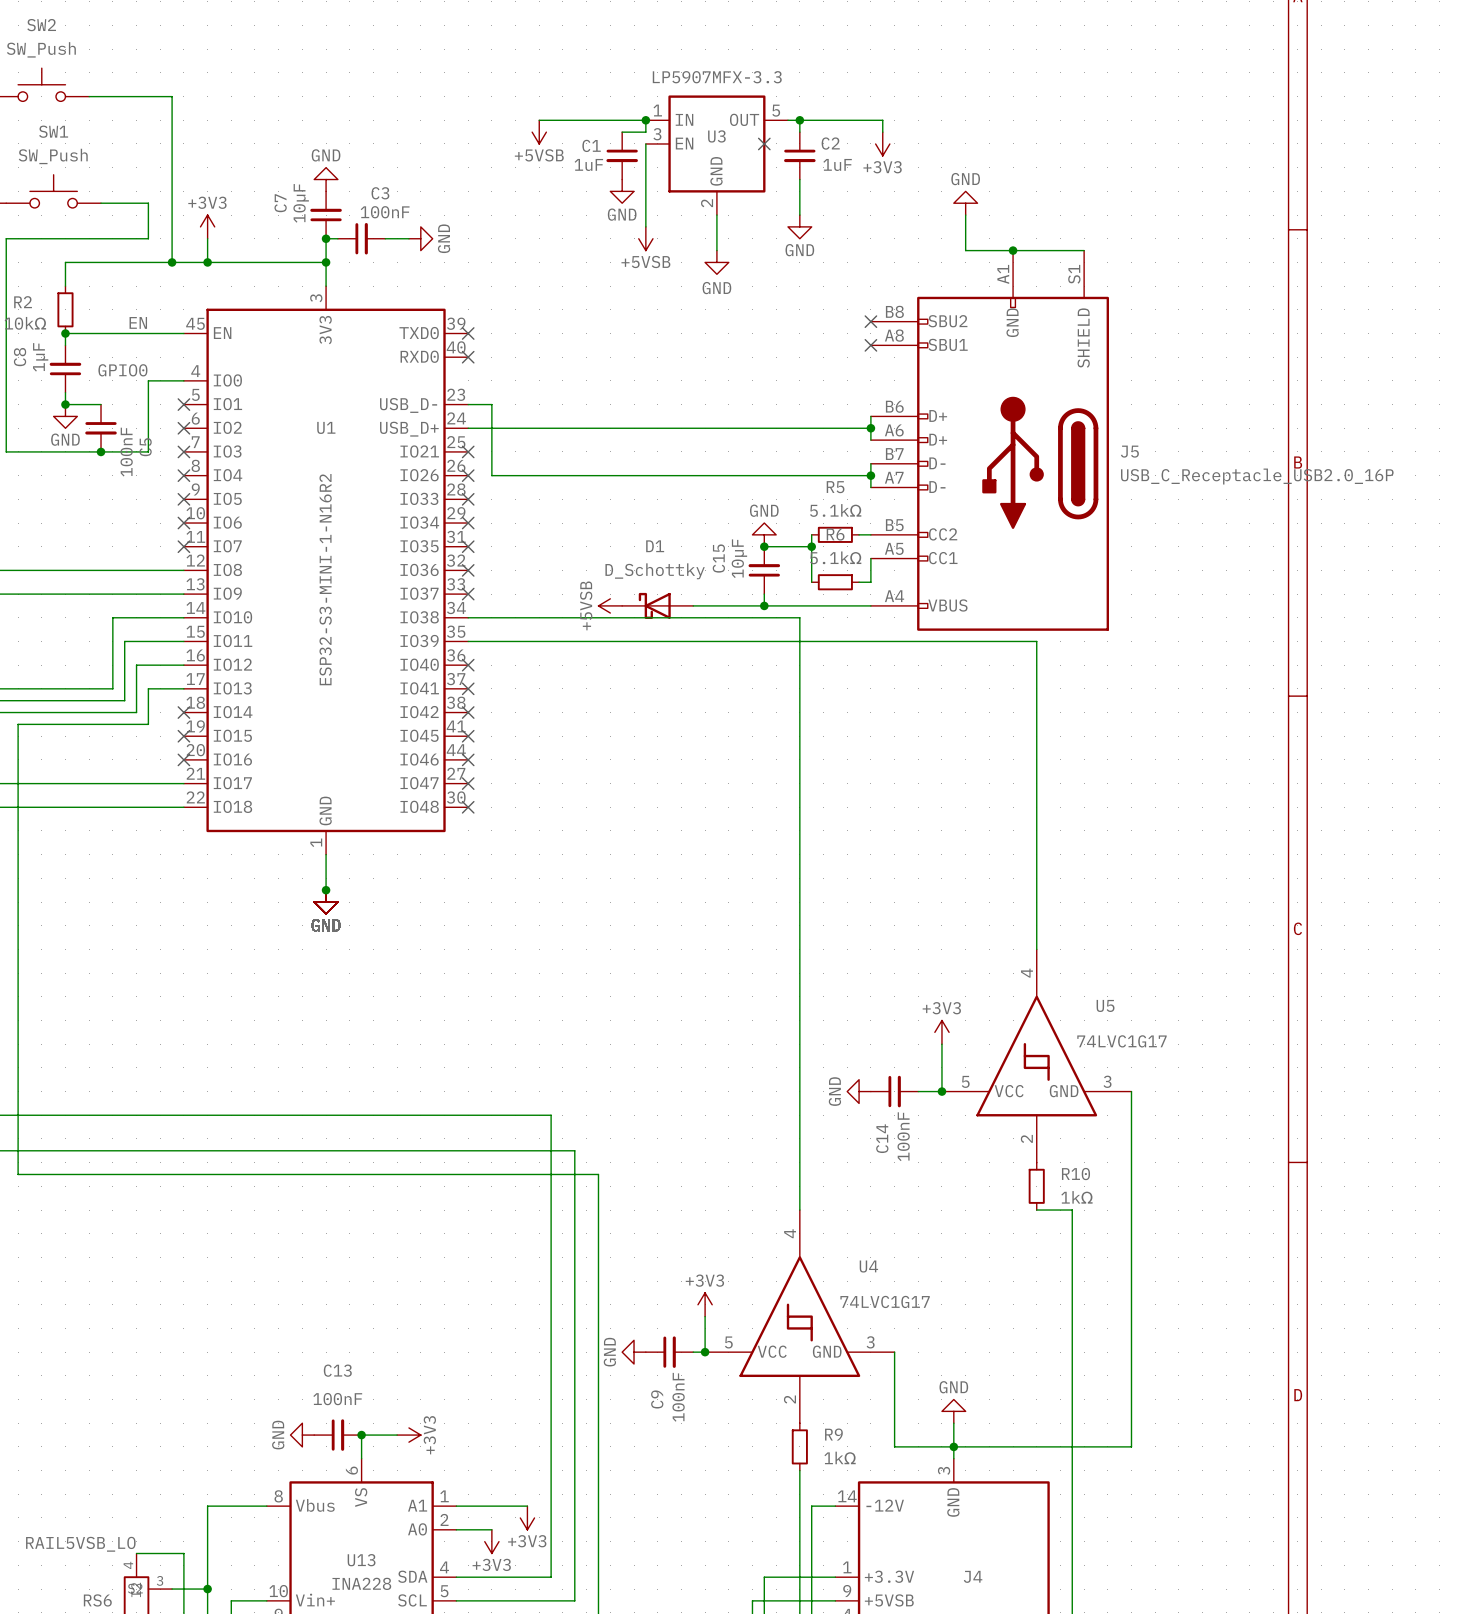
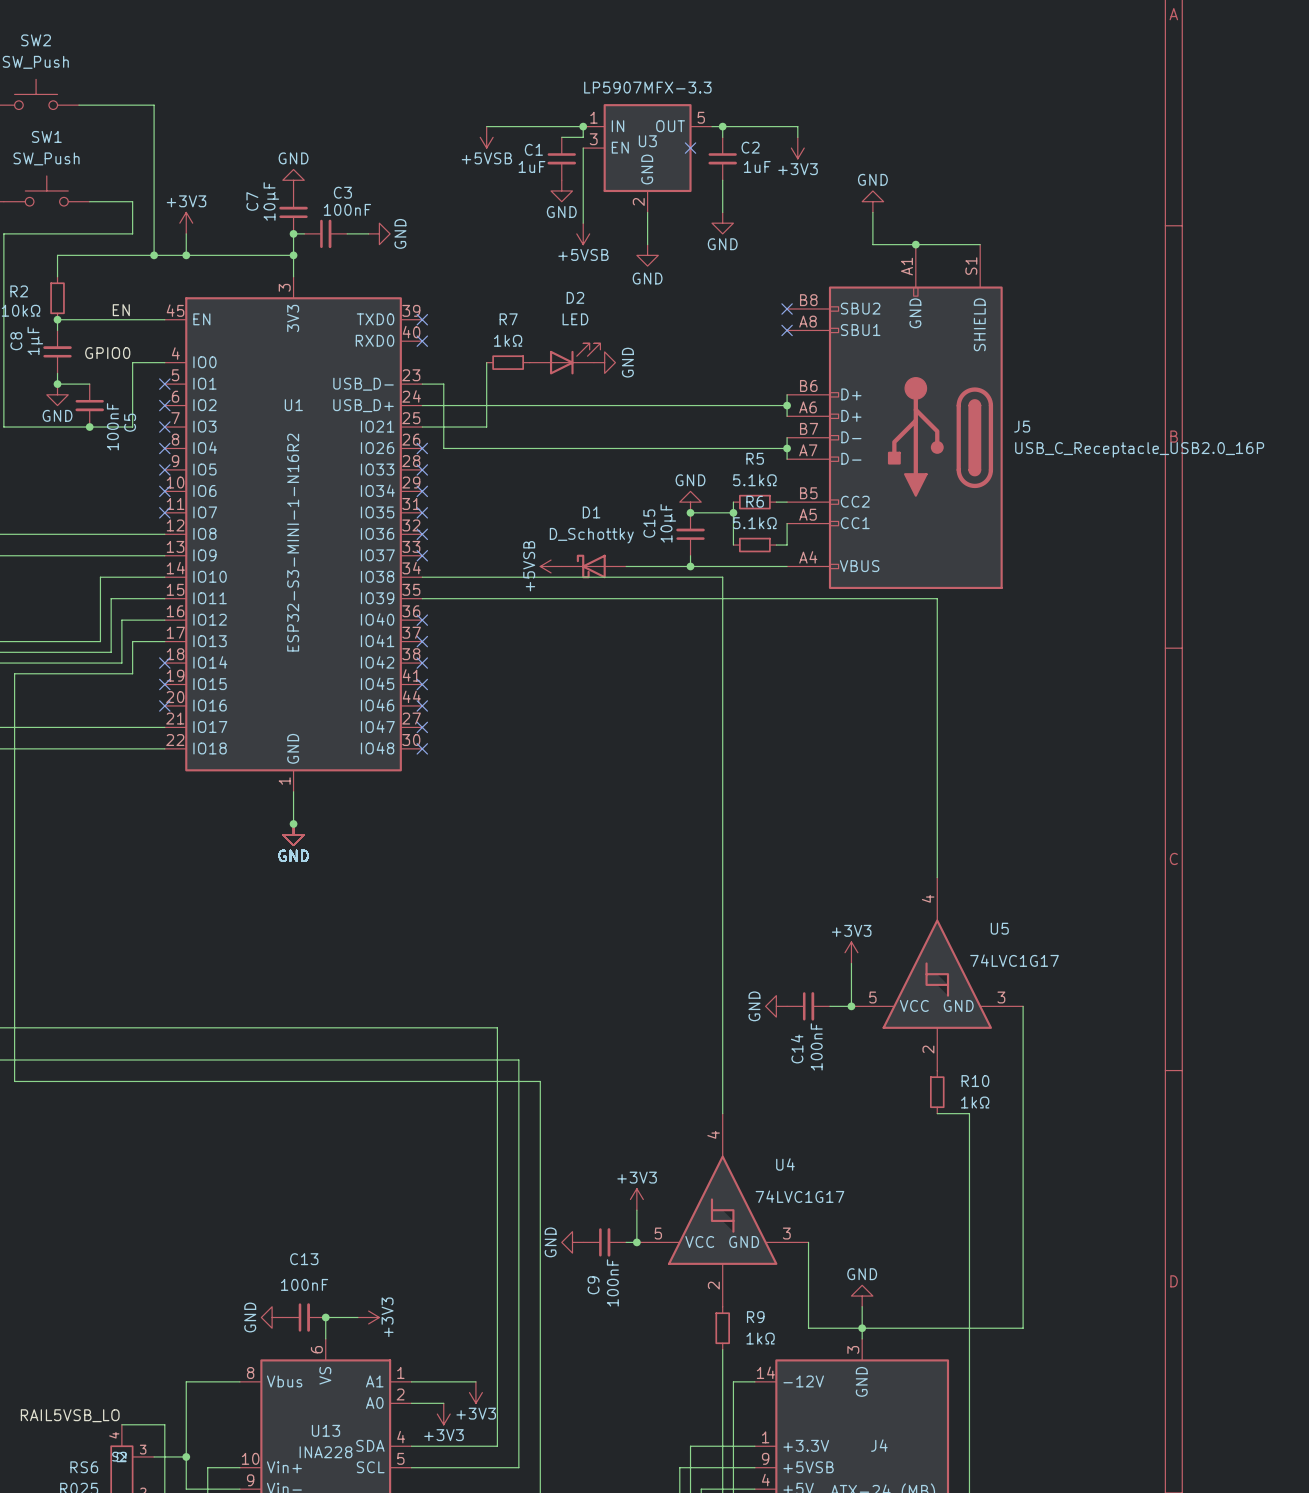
D2: none -> LED (564, 358)
wire: none -> (486, 362) (486, 427) (422, 427)
R7: none -> 1kΩ (508, 362)
power symbol: none -> GND (604, 362)
no-connect mark: (468, 451) -> none

